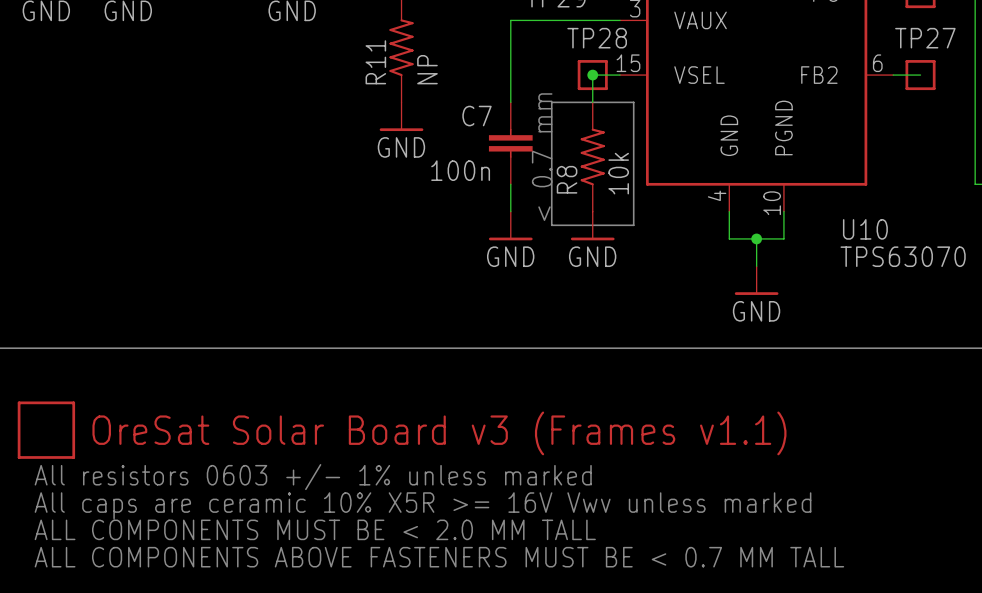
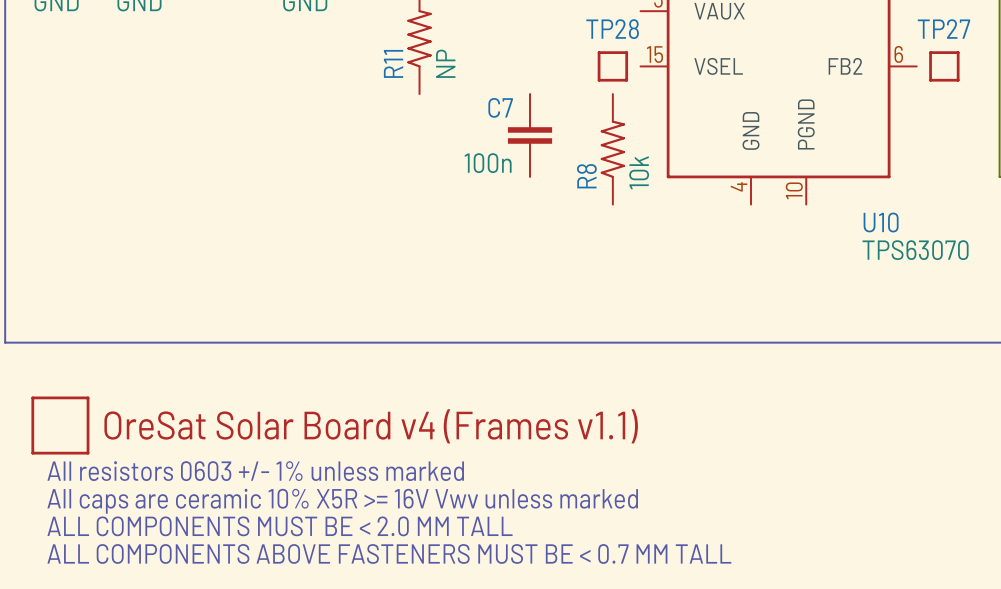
wire: (620, 20) (510, 20) (510, 102) -> none
junction: (592, 75) -> none
wire: (620, 75) (592, 75) (592, 102) -> none
wire: (893, 75) (920, 75) -> none
line: (551, 102) (633, 102) (633, 225) (551, 225) (551, 102) -> none
power symbol: GND (401, 116) -> none
text: < 0.7 mm (542, 157) -> none
wire: (510, 184) (510, 211) -> none
wire: (729, 211) (729, 238) (783, 238) (783, 211) -> none
power symbol: GND (510, 225) -> none
power symbol: GND (592, 225) -> none
wire: (756, 238) (756, 266) -> none
junction: (756, 238) -> none
power symbol: GND (756, 280) -> none
part text: OreSat Solar Board v3 (Frames v1.1) (439, 433) -> OreSat Solar Board v4 (Frames v1.1) (371, 426)

